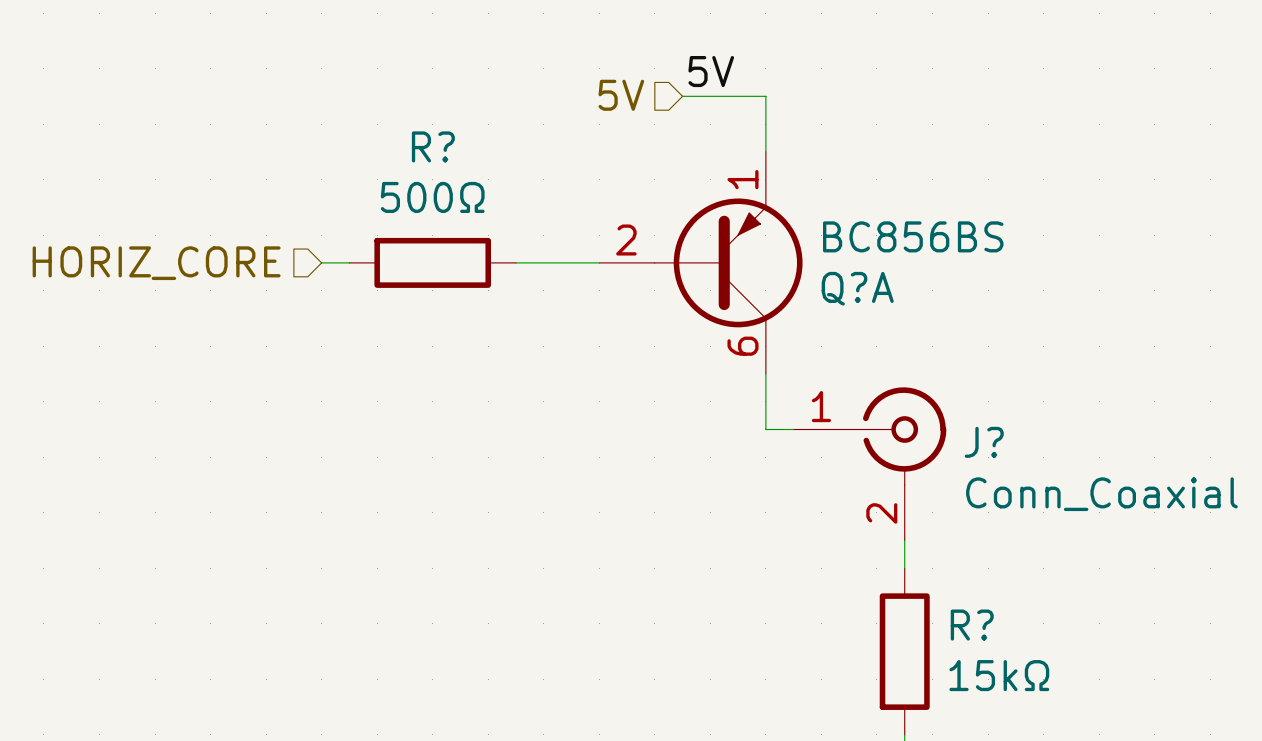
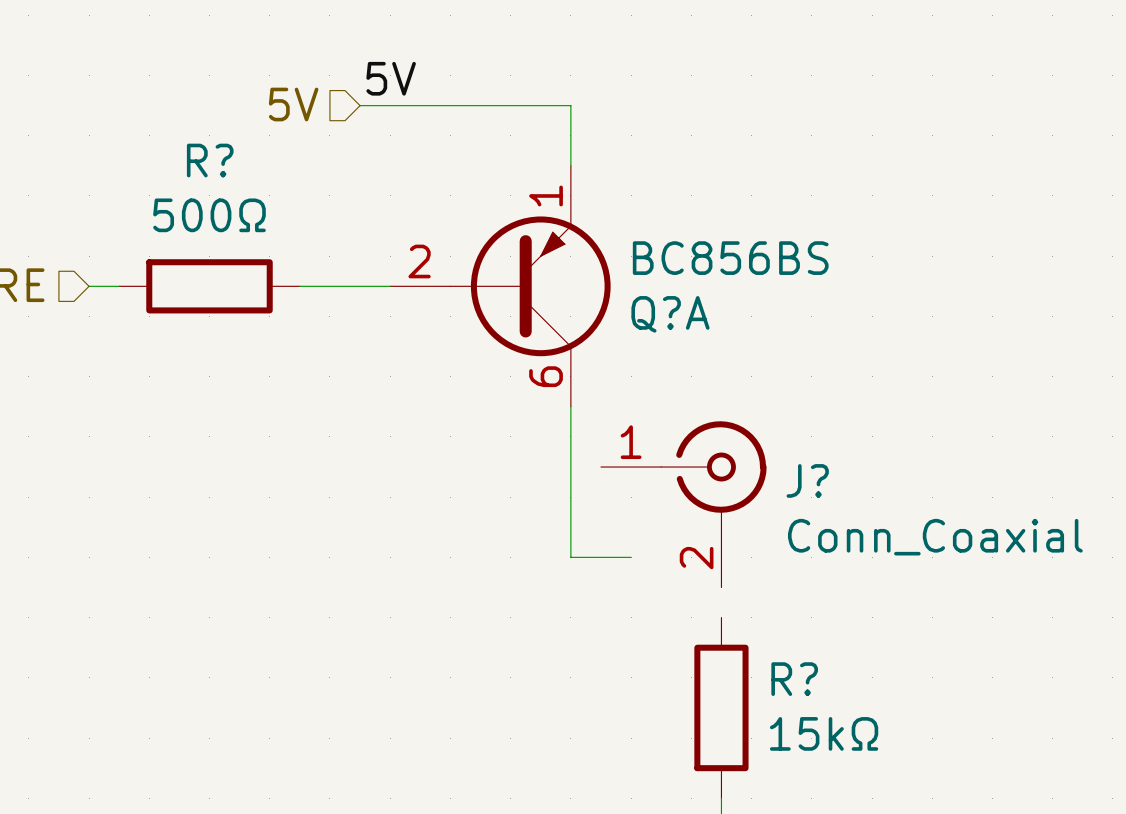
label position: 5V (711, 71) -> 5V (391, 78)
hierarchical label position: 5V (621, 95) -> 5V (293, 104)
wire: none -> (360, 105) (480, 105)
wire: (765, 429) (793, 429) -> (570, 467) (570, 557) (631, 557)
wire: (904, 540) (904, 568) -> none

